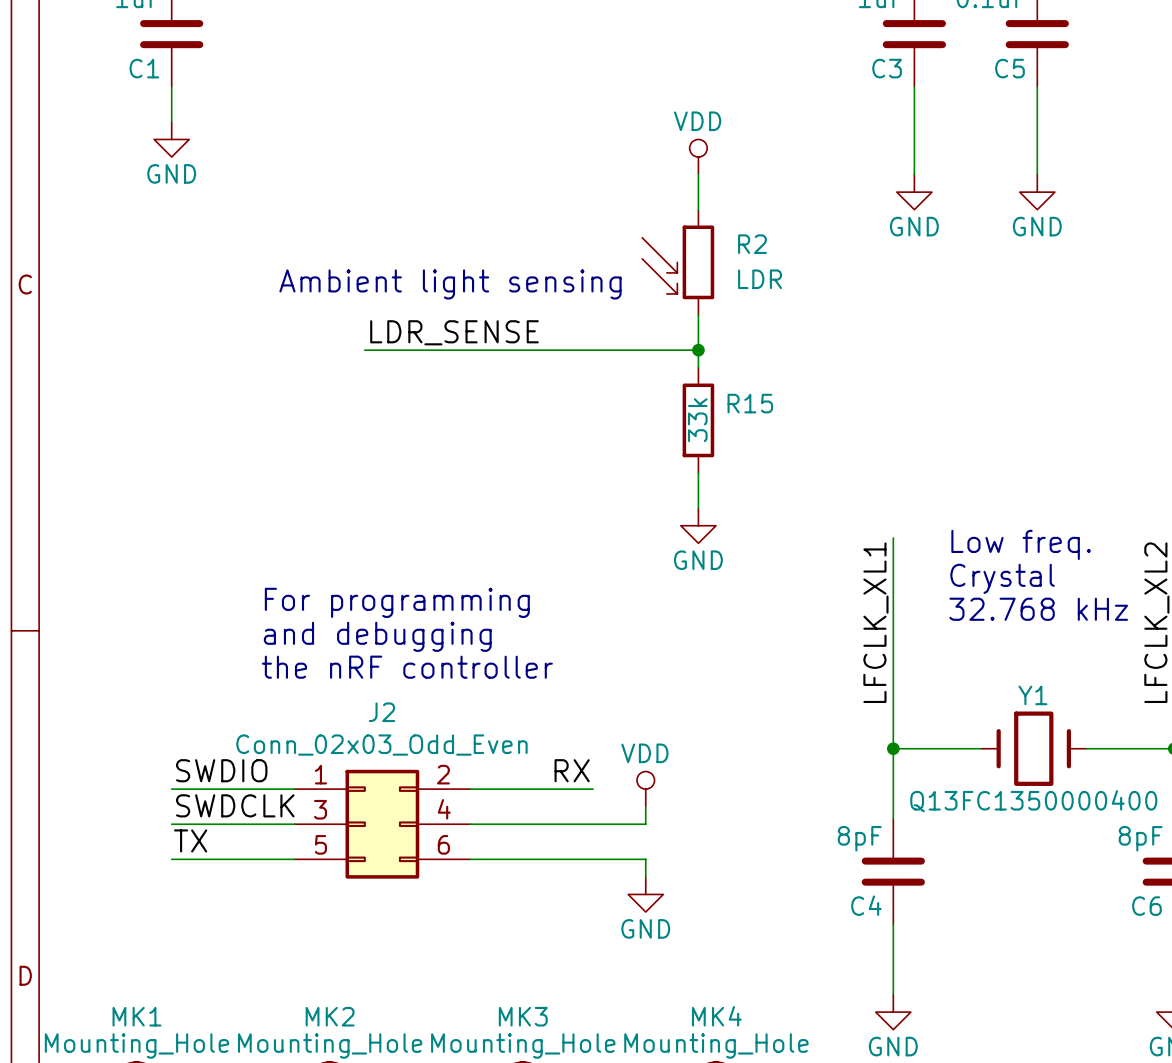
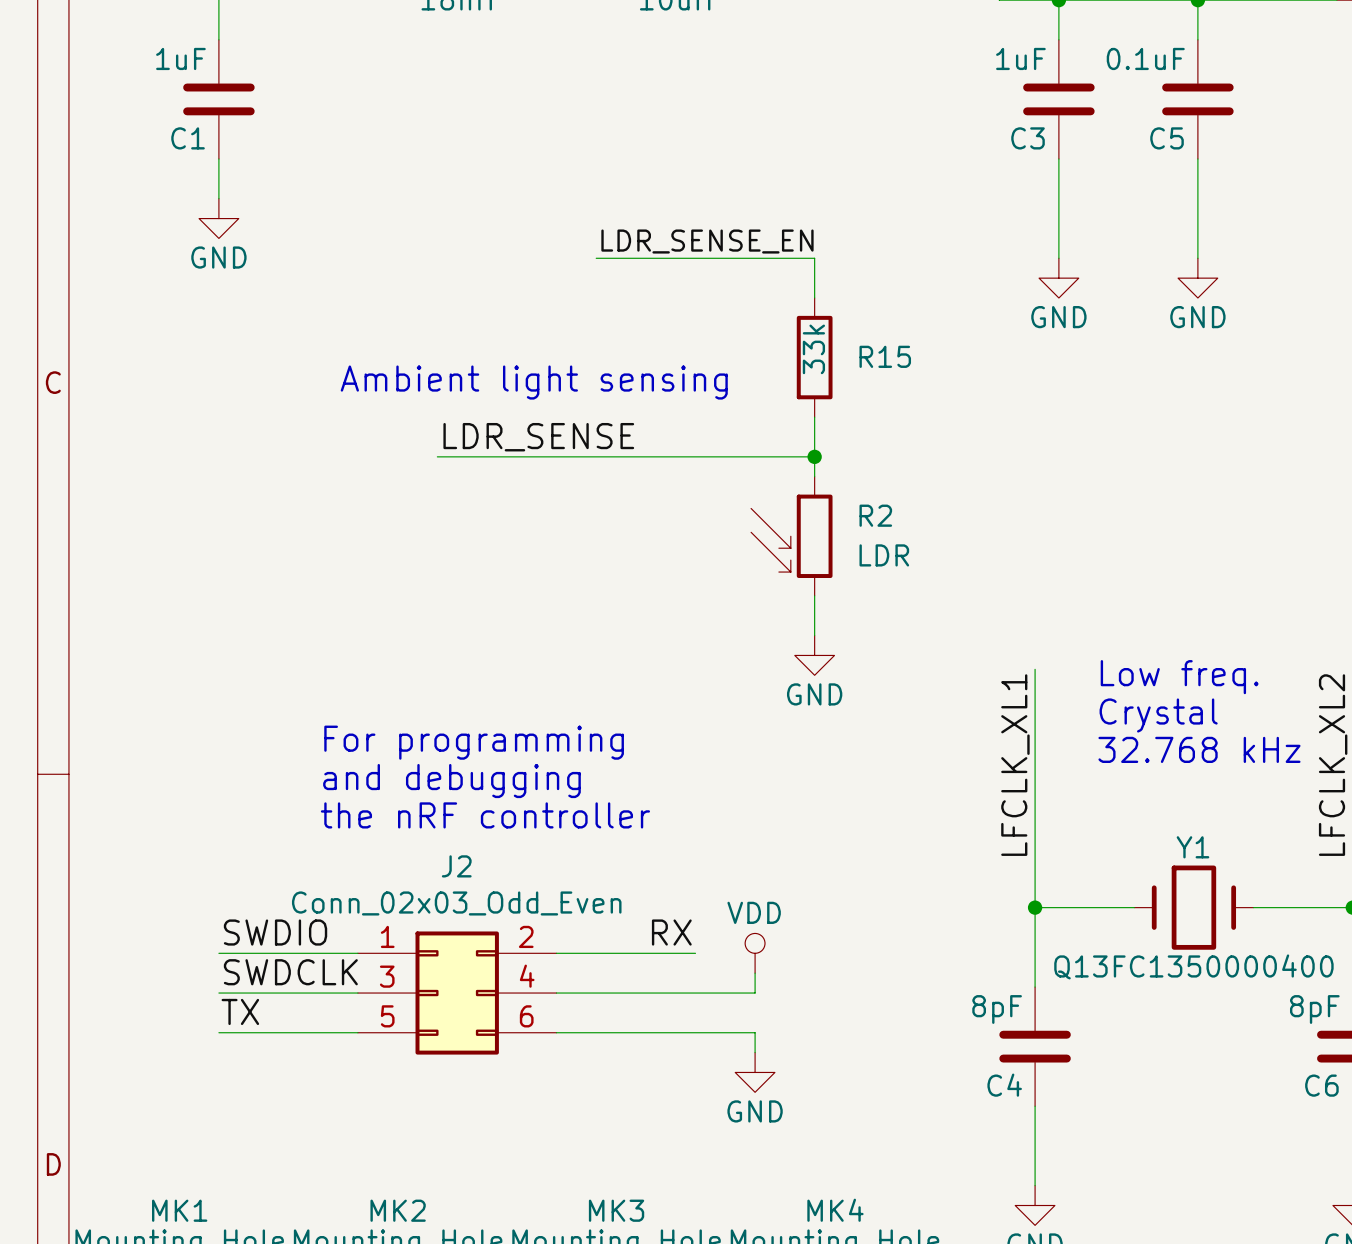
power symbol: VDD (698, 157) -> none
label: none -> LDR_SENSE_EN (707, 241)
wire: none -> (596, 258) (814, 258)
R2 position: (678, 262) -> (791, 536)
R15 name position: R15 (750, 403) -> R15 (885, 356)
R15 value position: 33k (697, 420) -> 33k (813, 349)
R15 position: (698, 420) -> (814, 357)

